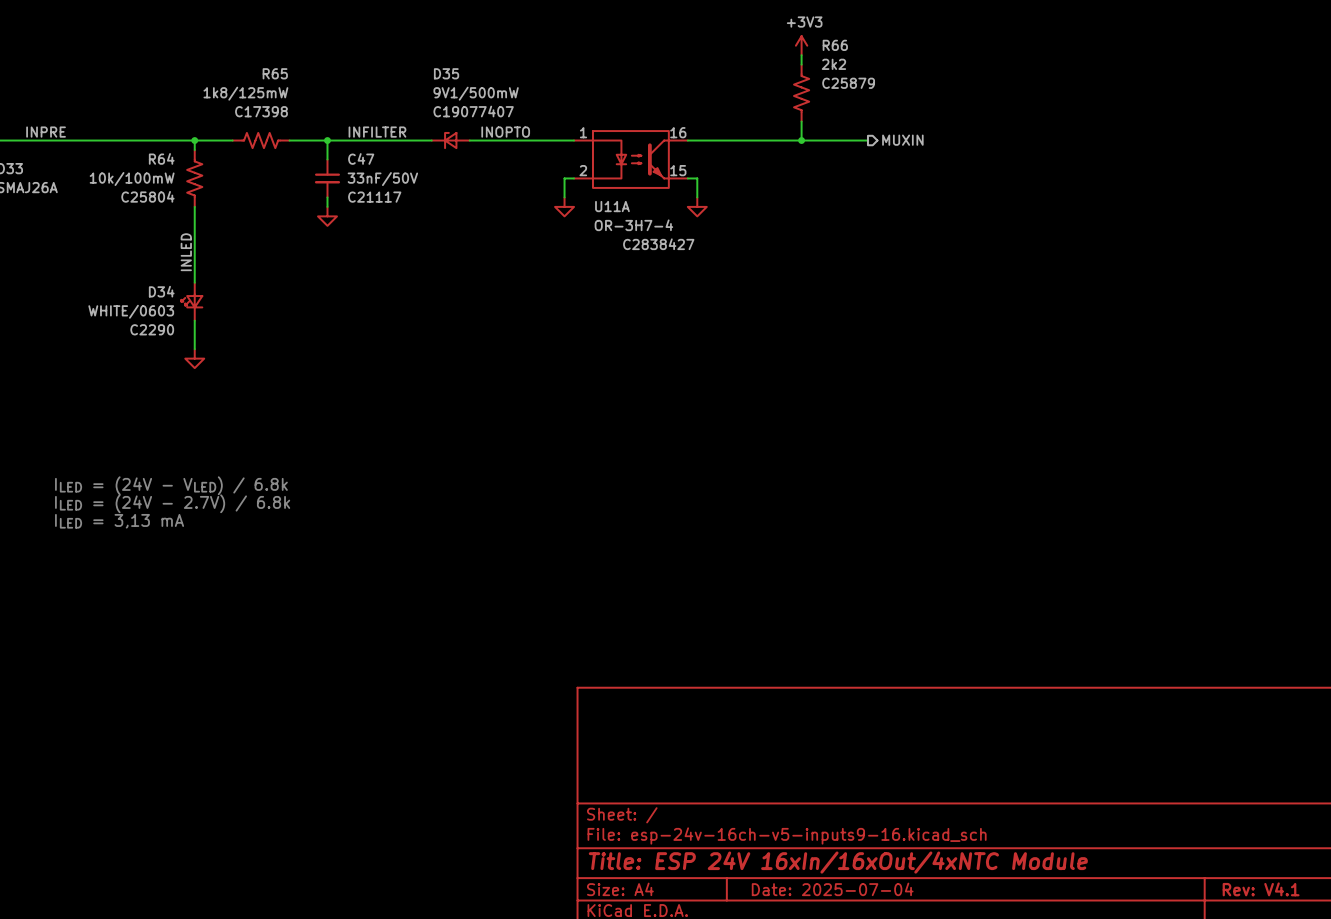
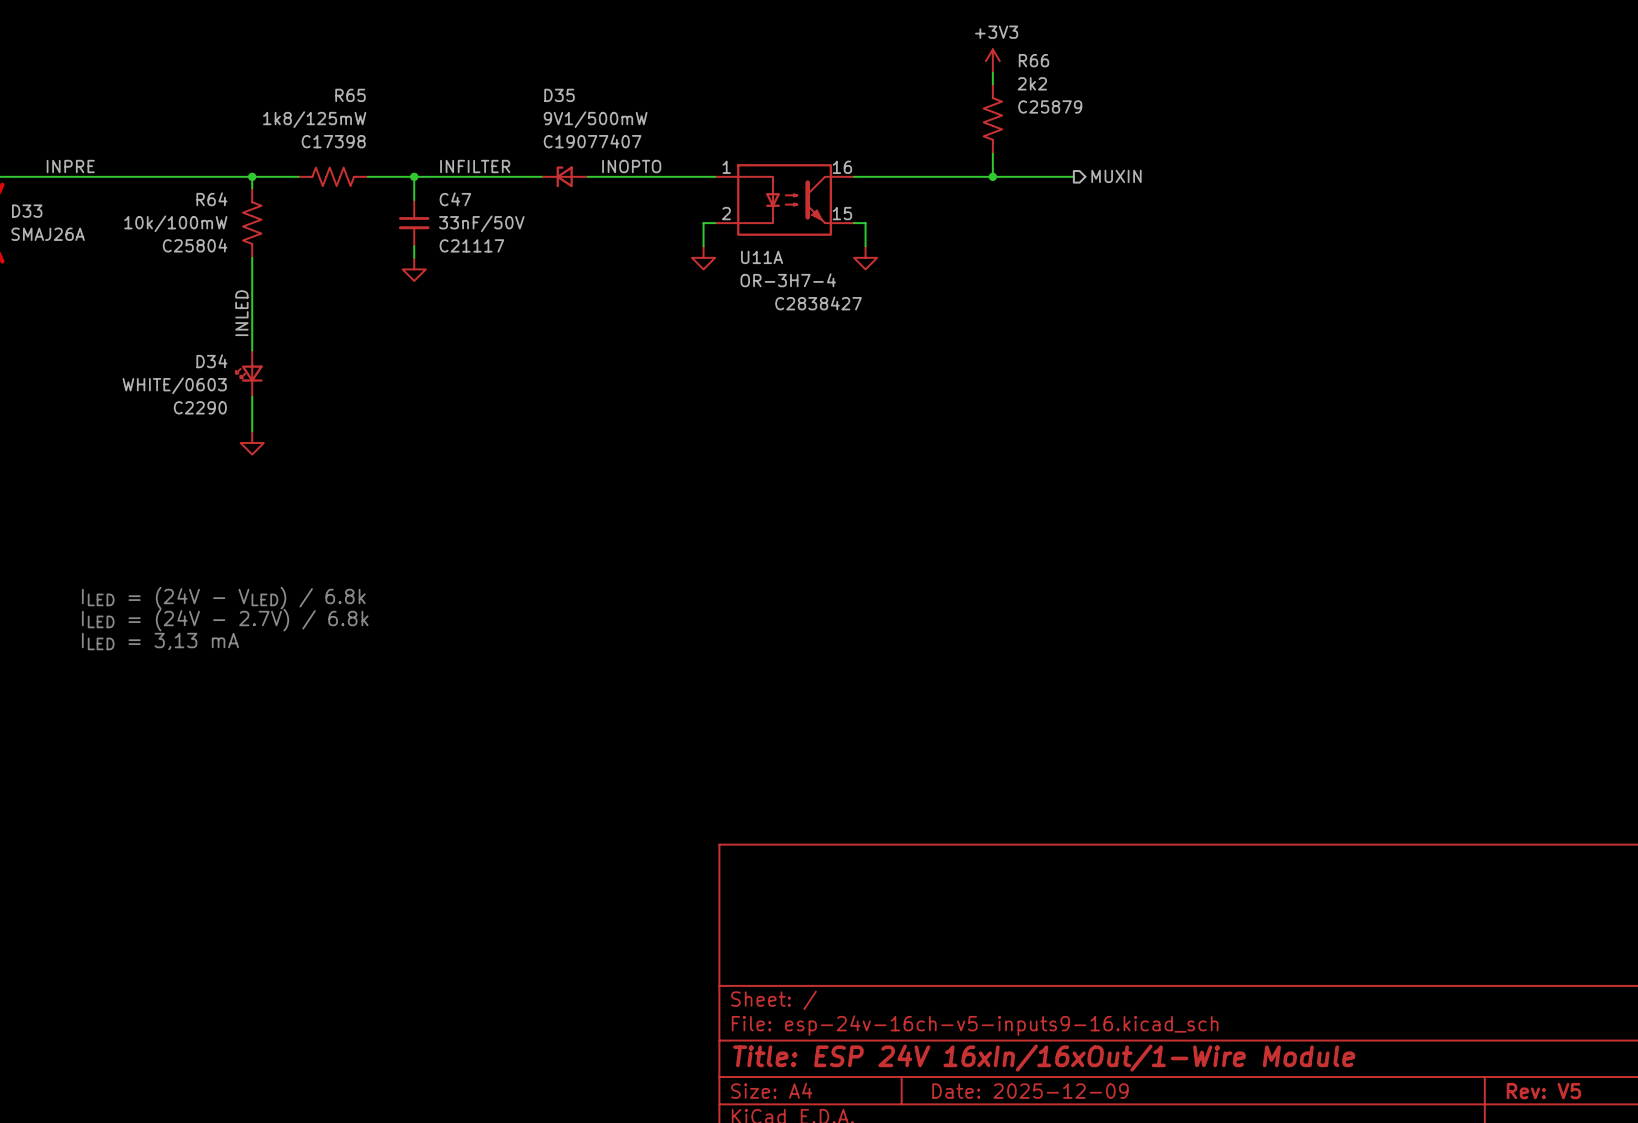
title block: Title: ESP 24V 16xIn/16xOut/4xNTC Module (838, 862) -> Title: ESP 24V 16xIn/16xOut/1-Wire Module (1044, 1058)
title block: Date: 2025-07-04 (832, 889) -> Date: 2025-12-09 (1030, 1091)
title block: Rev: V4.1 (1261, 889) -> Rev: V5 (1543, 1091)

